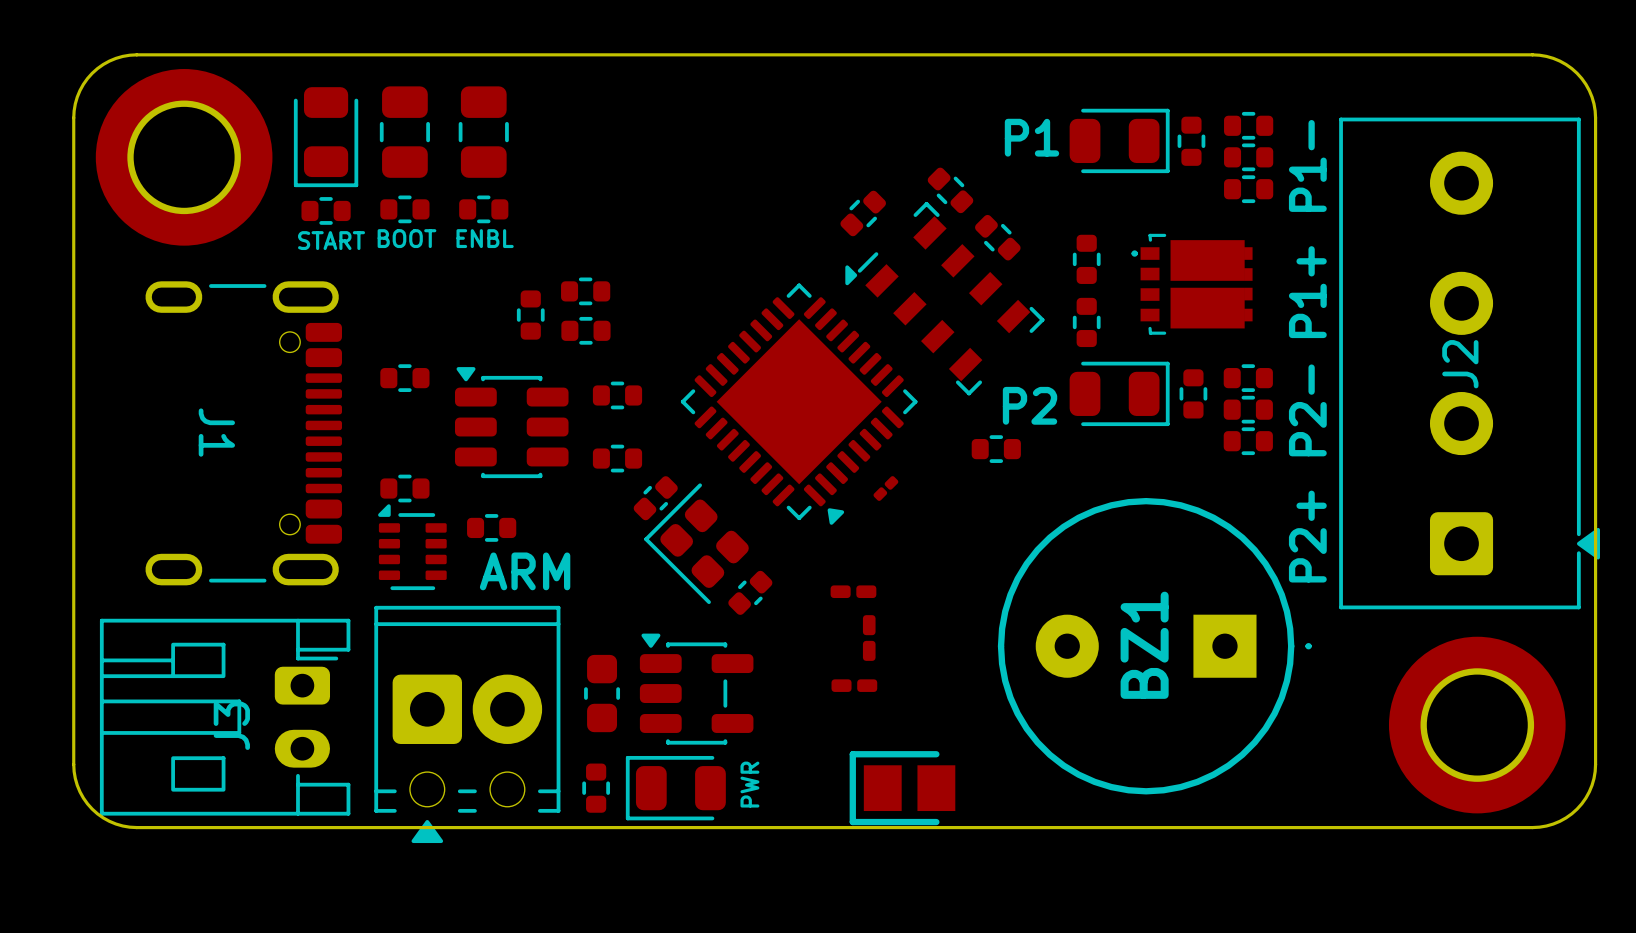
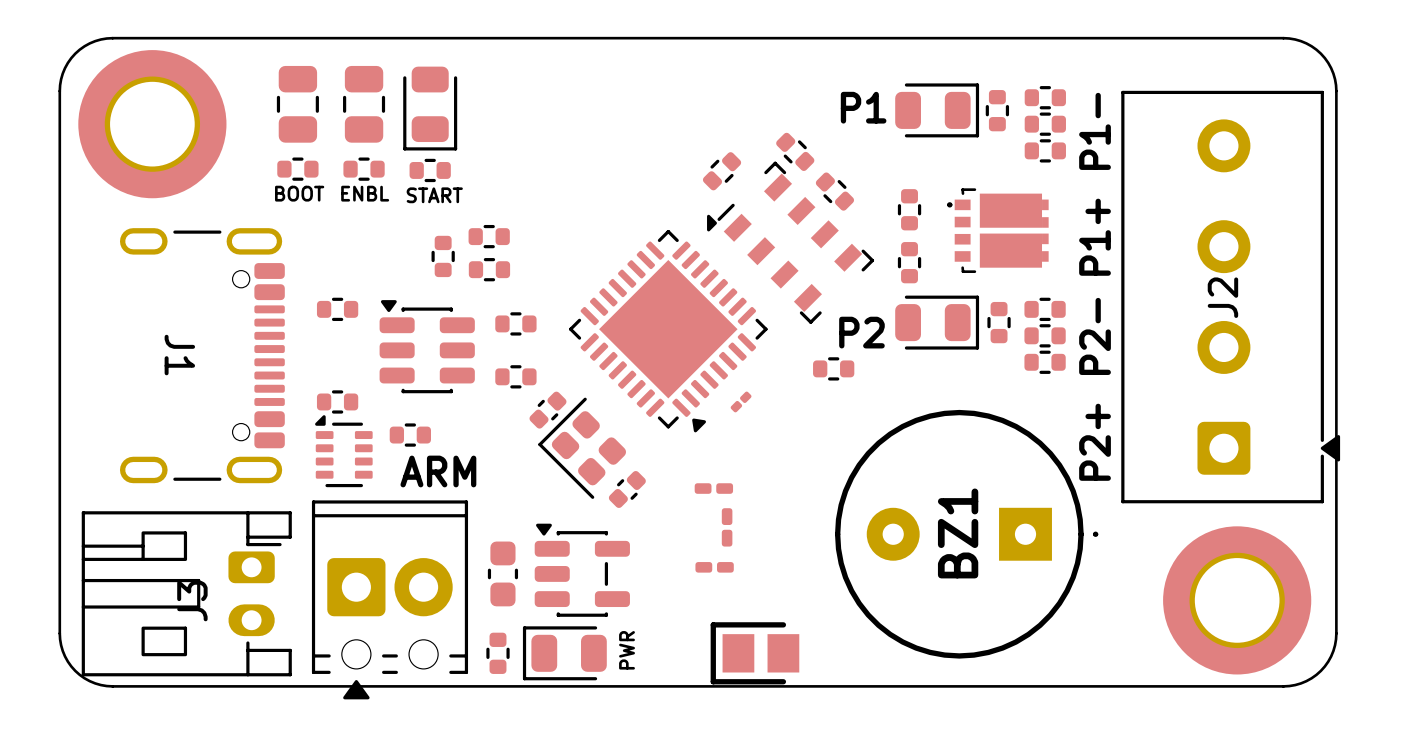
part: (404, 132) -> none
part: (483, 132) -> none
part: none -> (297, 104)
part: none -> (364, 104)
part position: (326, 137) -> (430, 108)
part: (404, 209) -> none
part: (483, 209) -> none
part: (326, 210) -> none
part: none -> (297, 169)
part: none -> (364, 169)
part: none -> (430, 170)
text position: BOOT (406, 238) -> BOOT (299, 193)
text position: ENBL (485, 238) -> ENBL (365, 193)
text position: START (331, 240) -> START (434, 195)

